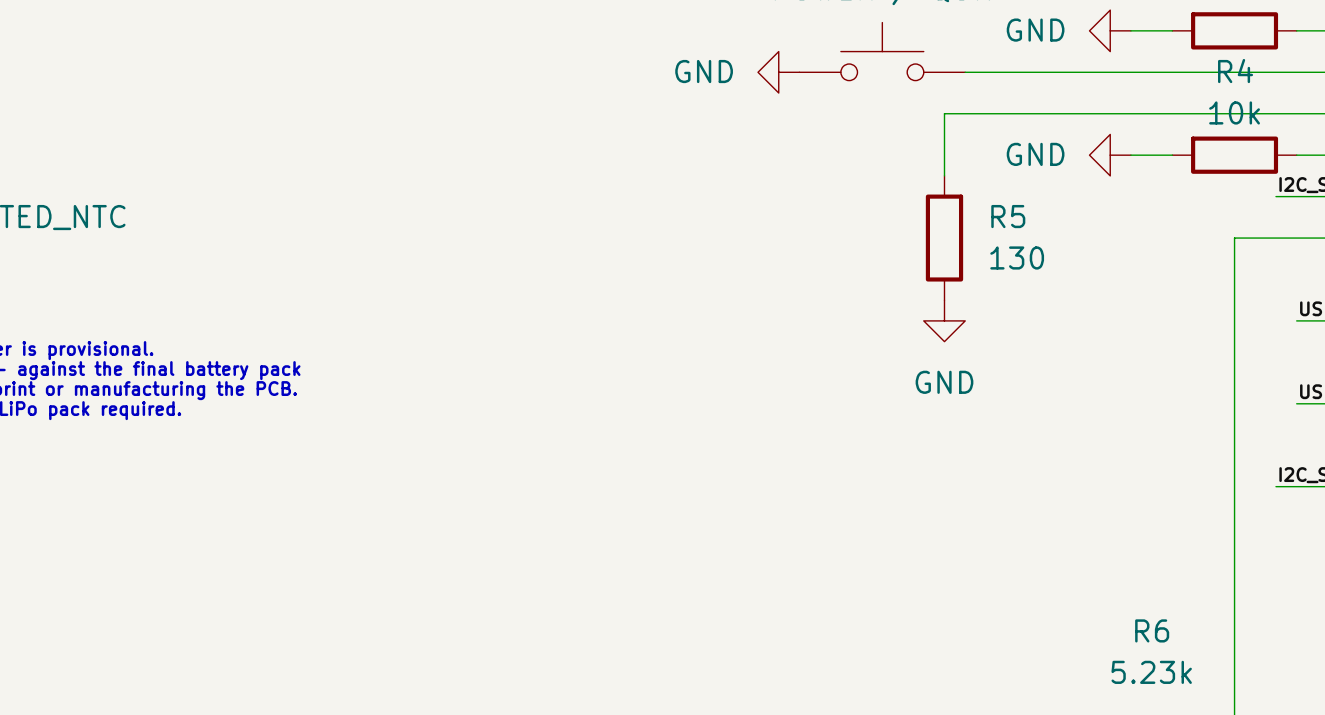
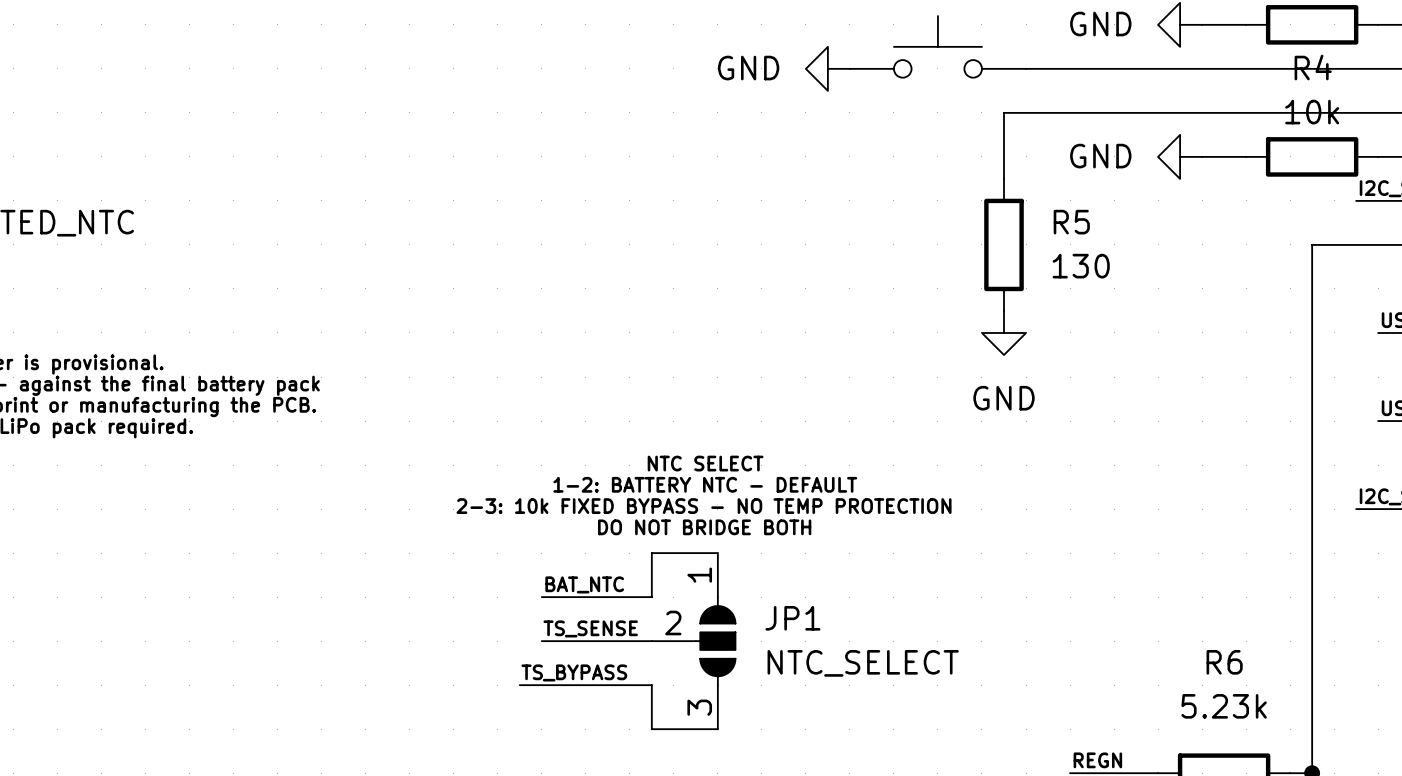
text: none -> NTC SELECT (705, 463)
text: none -> 1-2: BATTERY NTC - DEFAULT (705, 484)
text: none -> 2-3: 10k FIXED BYPASS - NO TEMP PROTECTION (704, 506)
text: none -> DO NOT BRIDGE BOTH (704, 527)
wire: none -> (717, 553) (651, 553) (651, 597) (541, 597)
label: none -> BAT_NTC (584, 584)
label: none -> TS_SENSE (590, 628)
wire: none -> (541, 641) (651, 641)
JP1: none -> NTC_SELECT (693, 641)
label: none -> TS_BYPASS (574, 672)
wire: none -> (519, 685) (651, 685) (651, 729) (717, 729)

